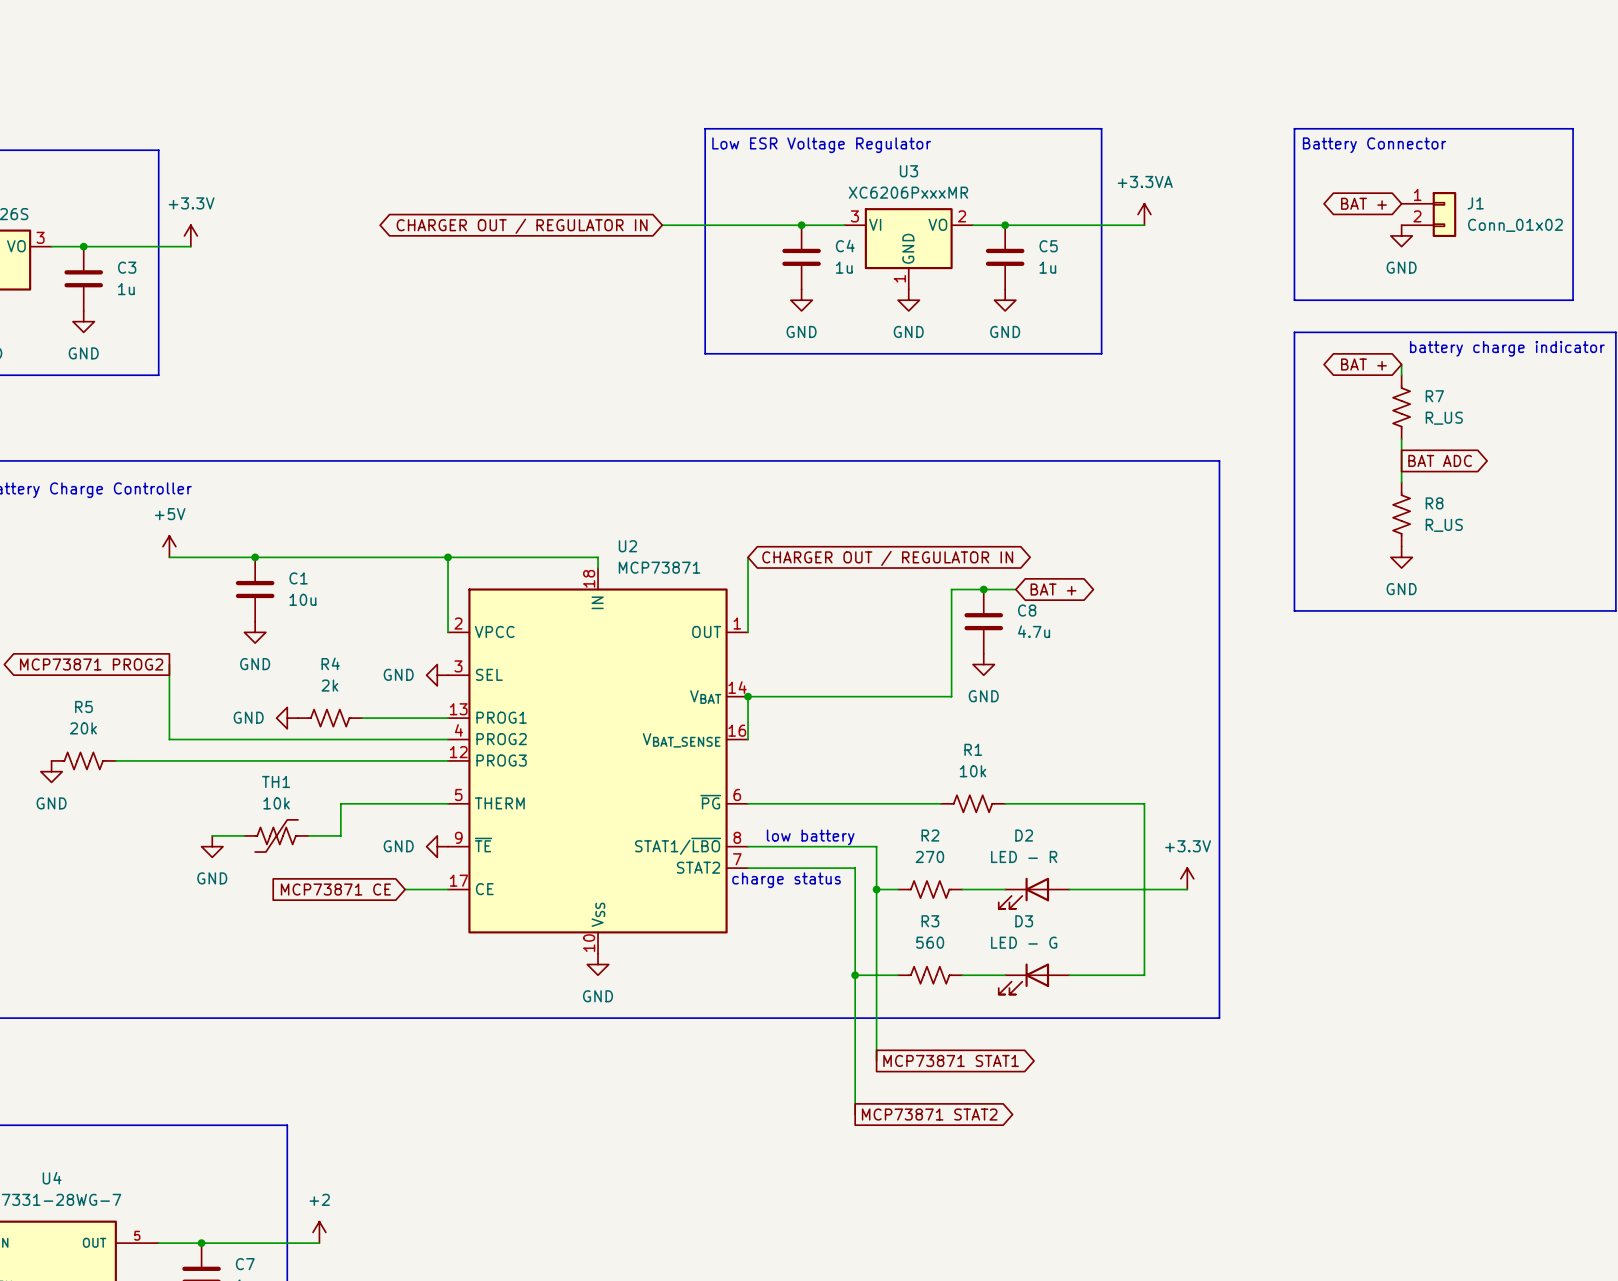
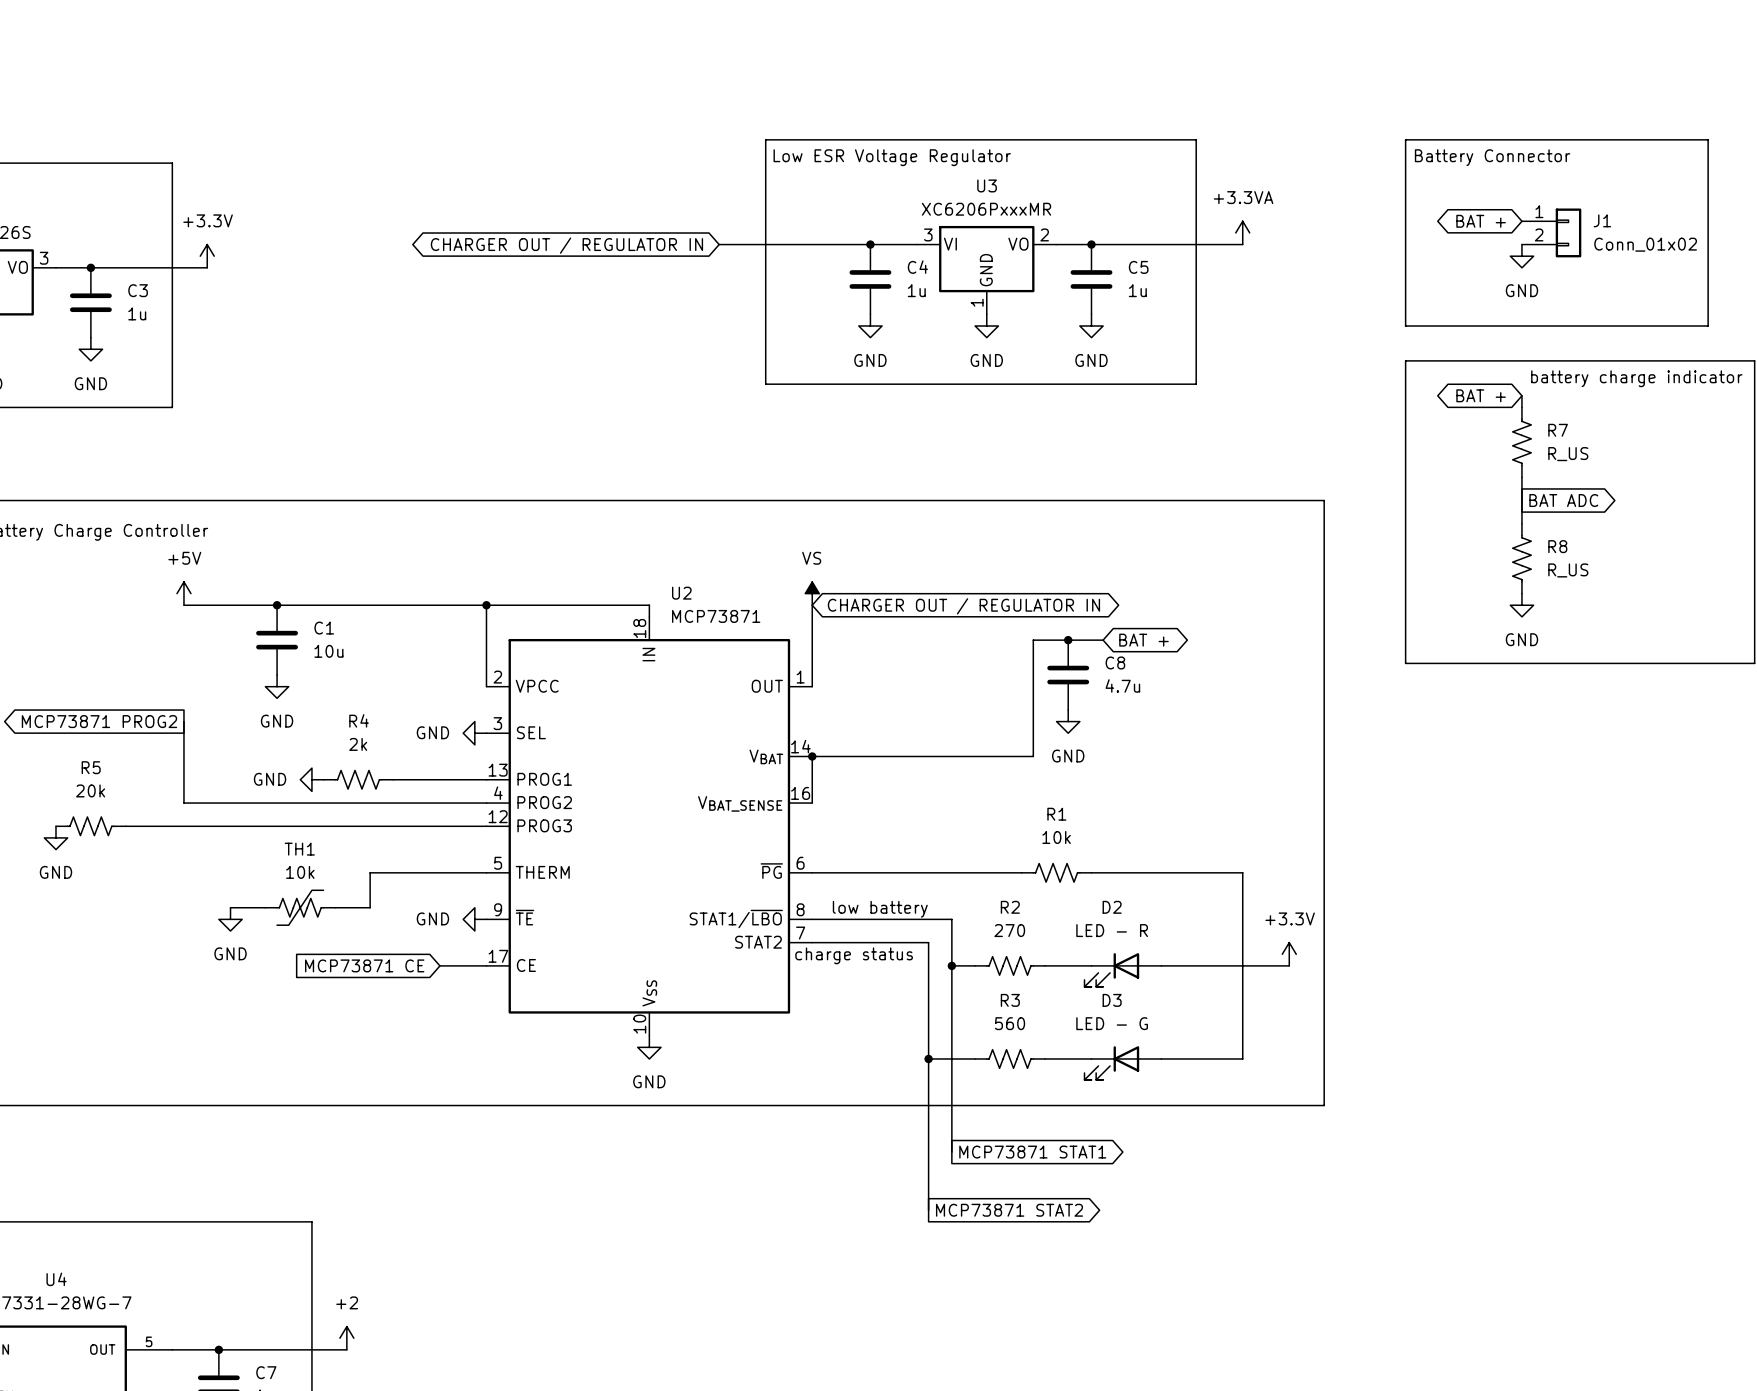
power symbol: none -> VS (812, 593)

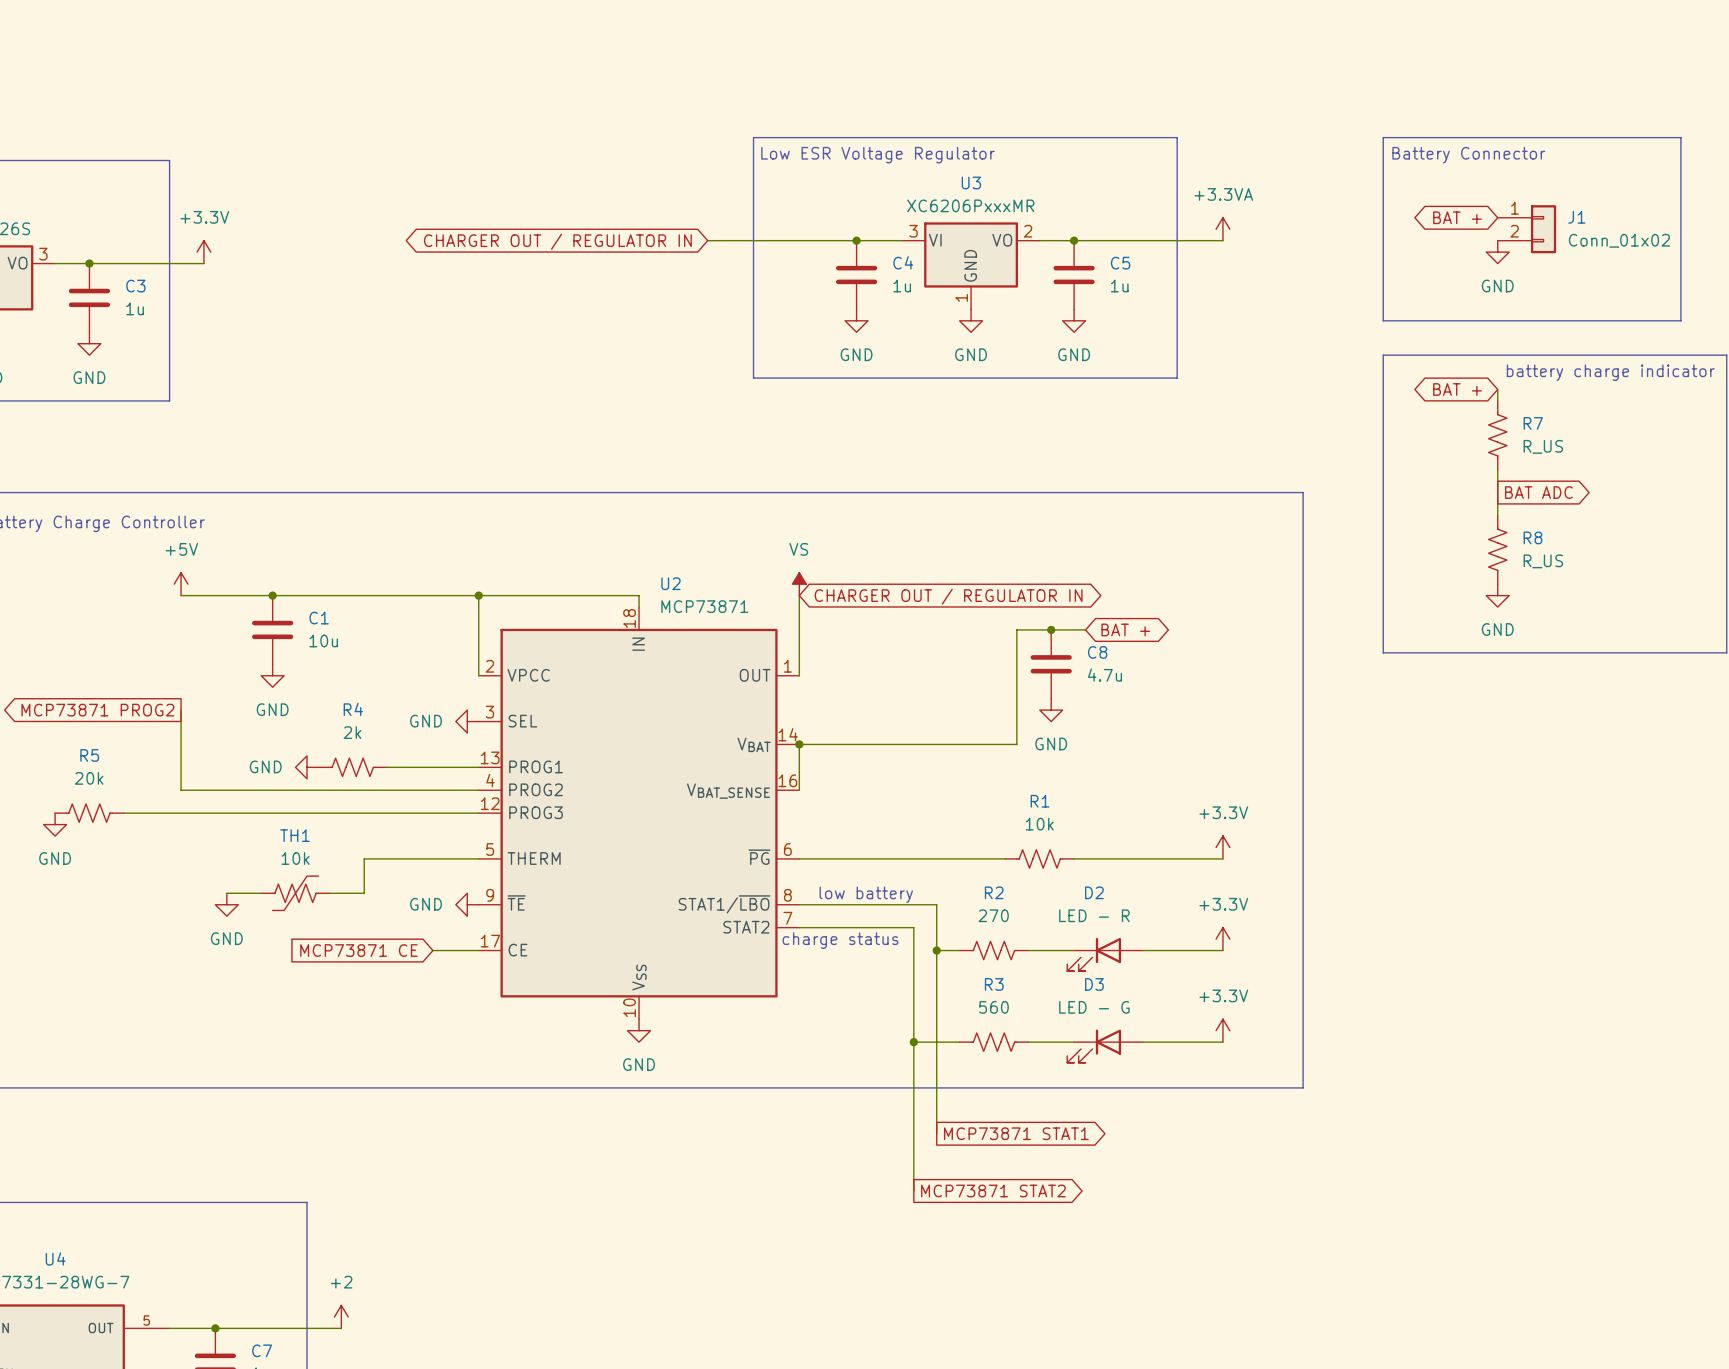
power symbol: none -> +3.3V (1222, 847)
wire: (1242, 872) (1242, 1058) -> none
power symbol position: +3.3V (1289, 954) -> +3.3V (1222, 939)
wire: (1242, 965) (1289, 965) -> none
power symbol: none -> +3.3V (1222, 1030)

